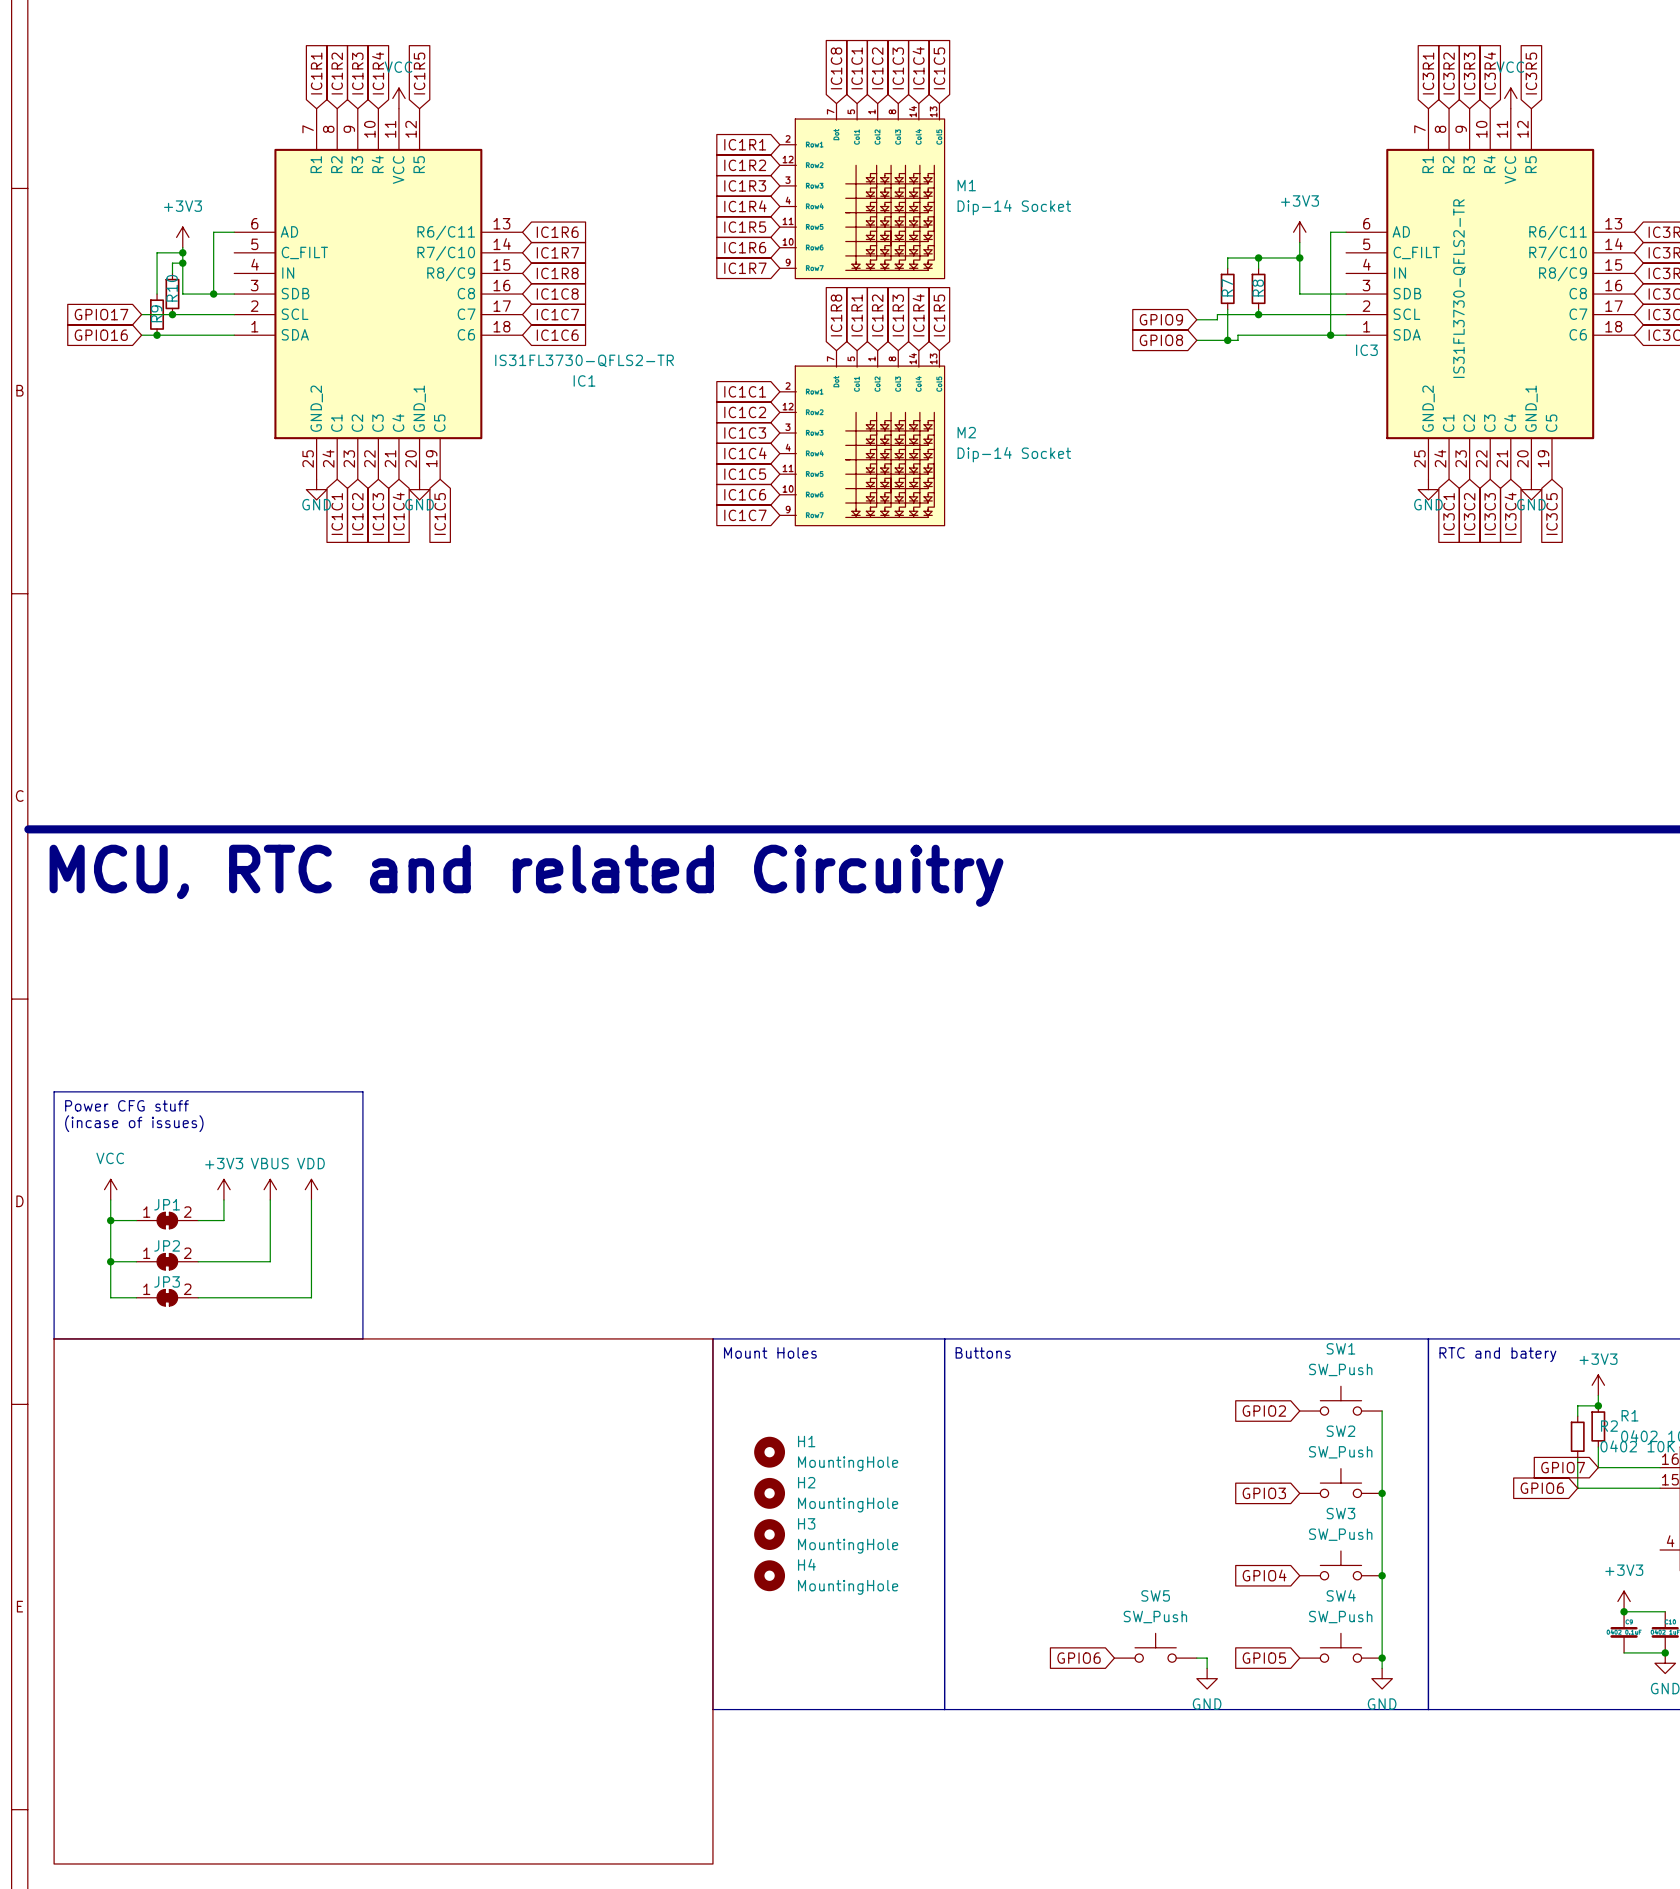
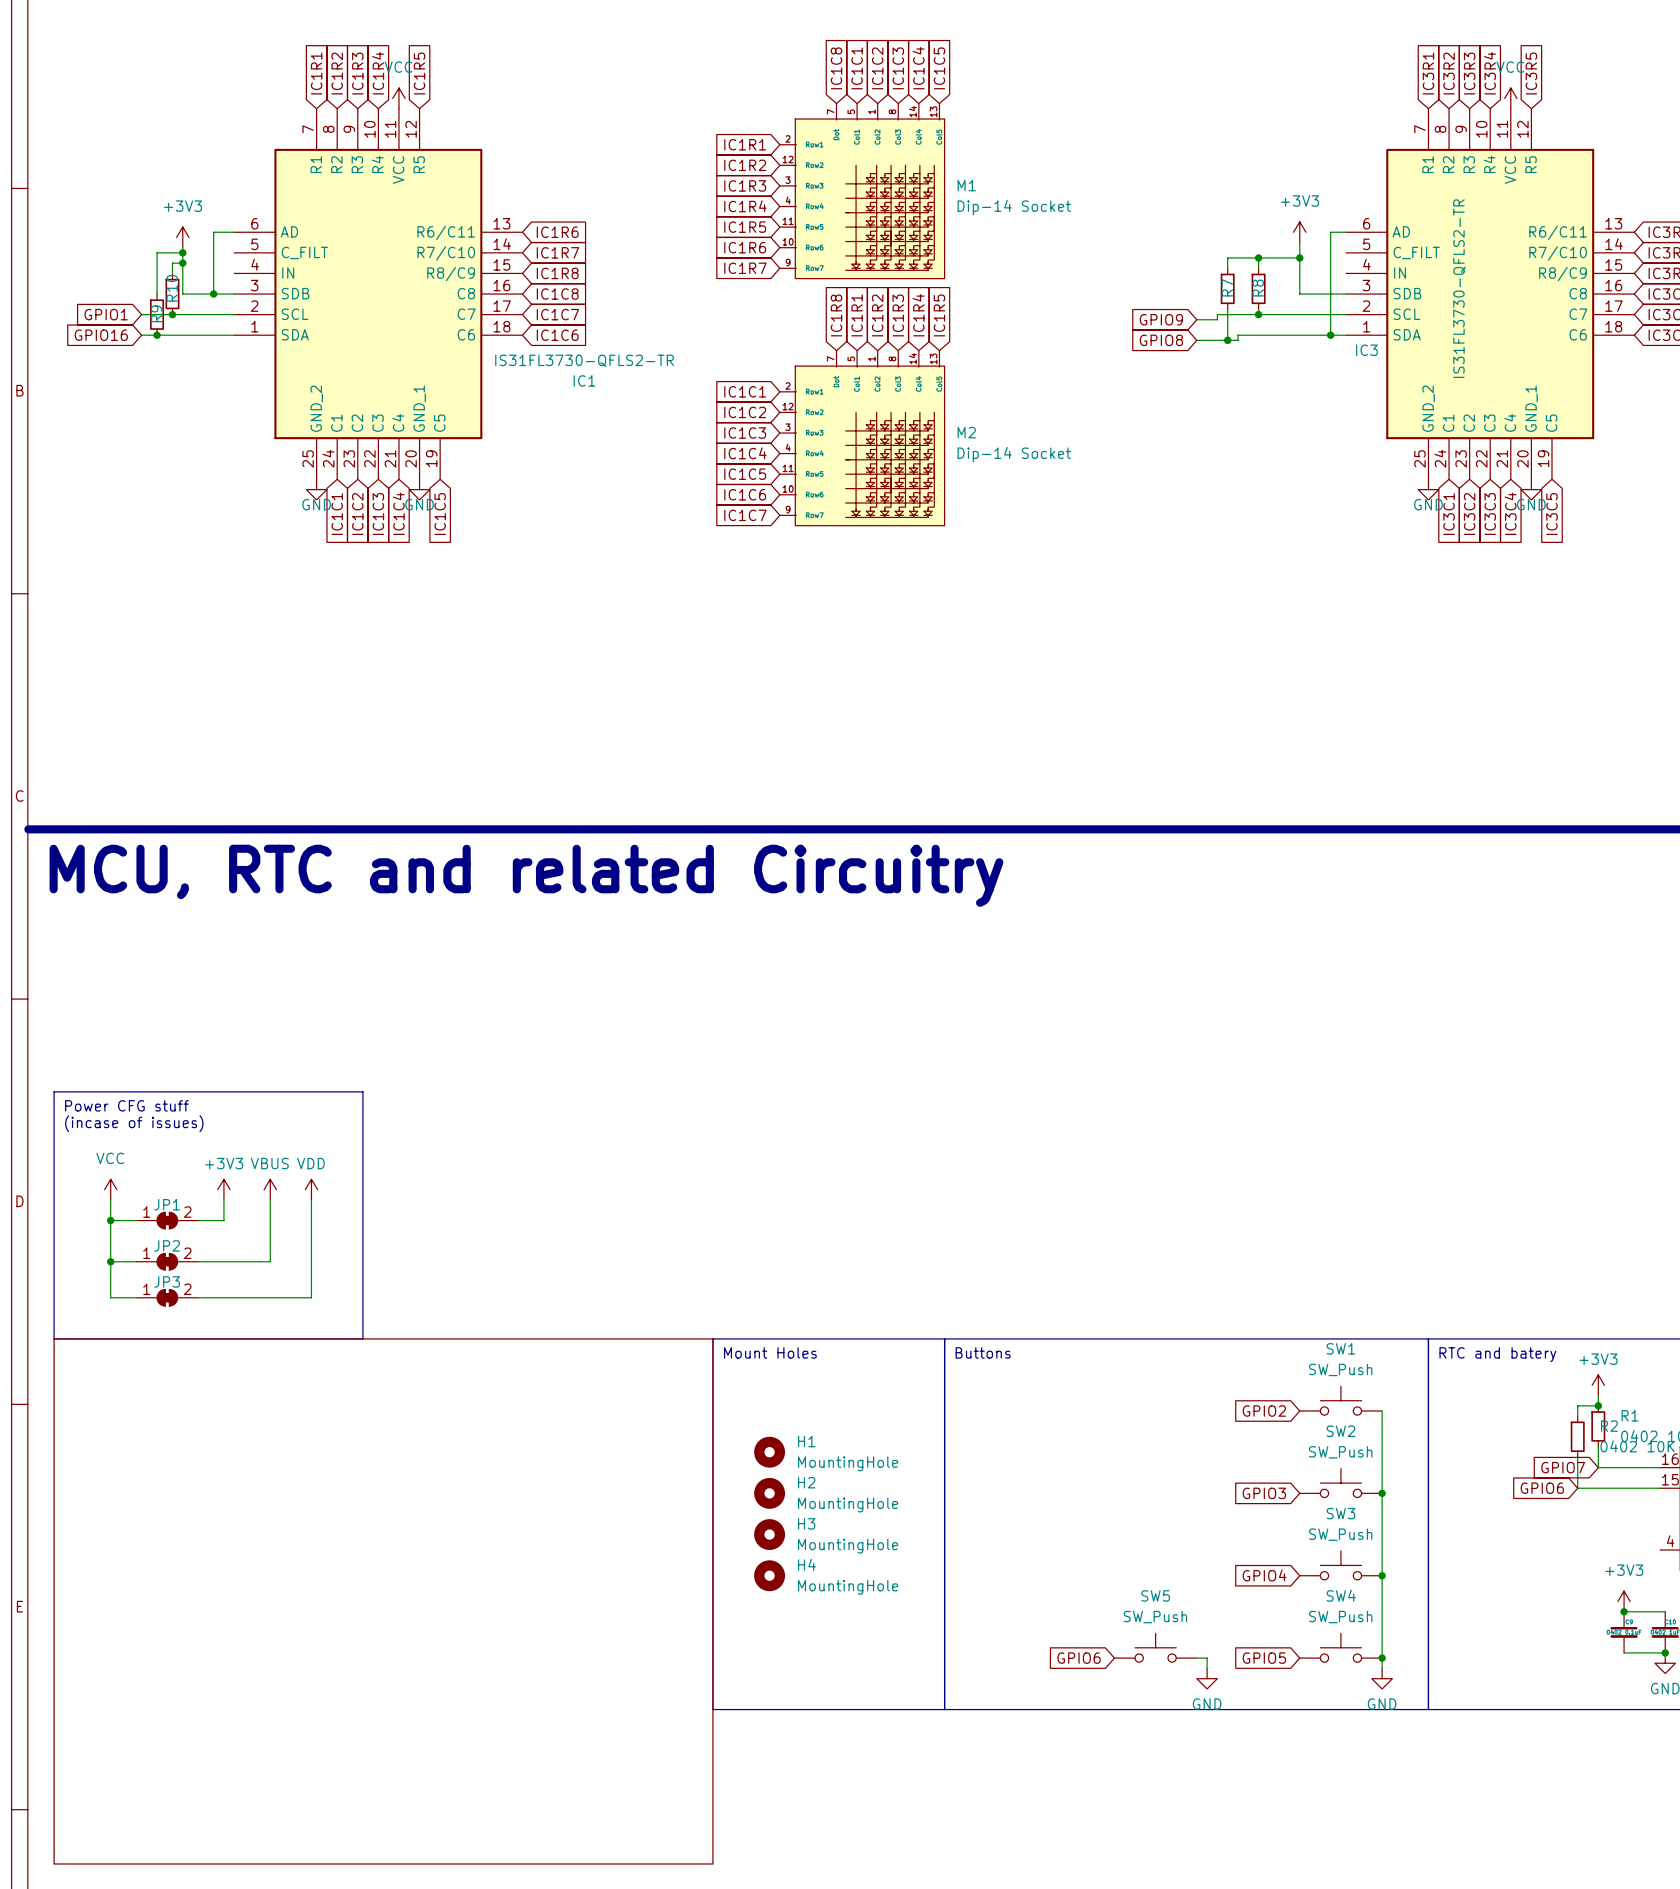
global label: GPIO17 (101, 314) -> GPIO1 (106, 314)

